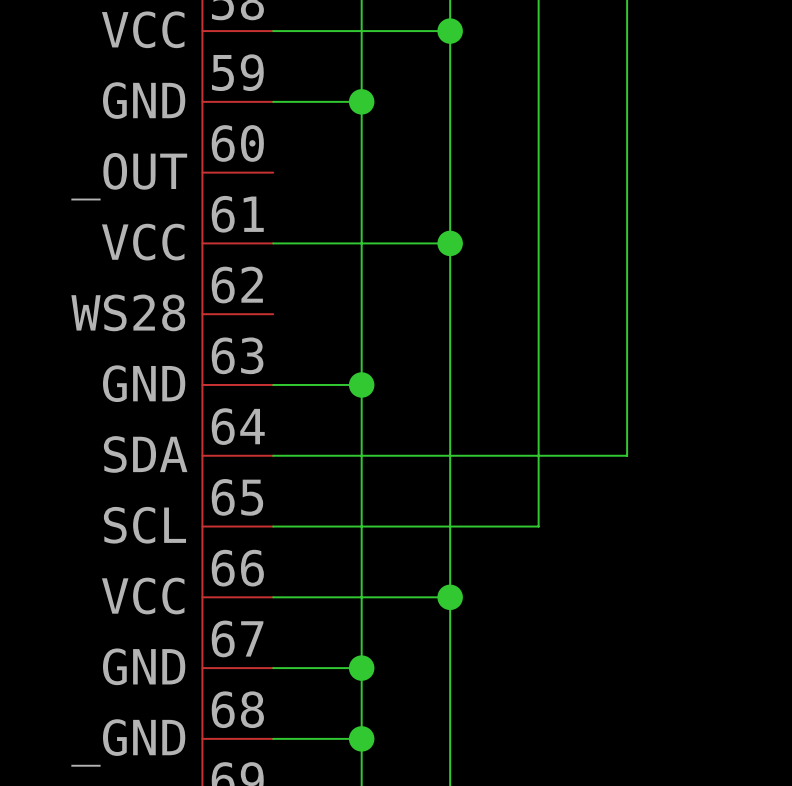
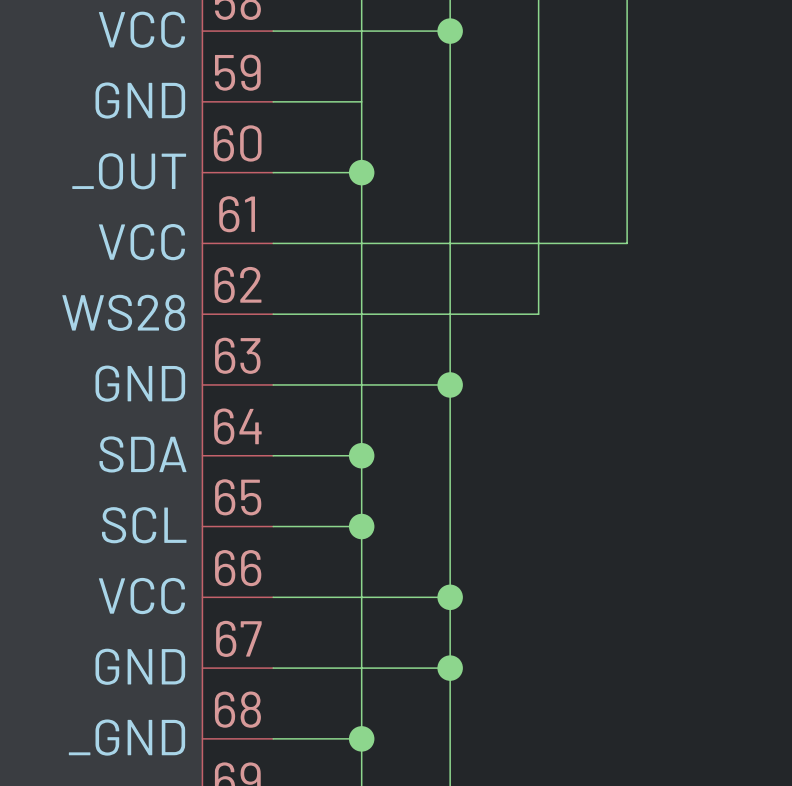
junction: (361, 101) -> none
wire: none -> (273, 172) (361, 172)
junction: none -> (361, 172)
junction: (450, 243) -> none
wire: (627, 243) (627, 455) (361, 455) -> (627, 243) (450, 243)
wire: (538, 314) (538, 526) (361, 526) -> (538, 314) (273, 314)
wire: none -> (361, 384) (450, 384)
junction: (361, 384) -> none
junction: none -> (450, 384)
junction: none -> (361, 455)
junction: none -> (361, 526)
wire: none -> (361, 668) (450, 668)
junction: (361, 668) -> none
junction: none -> (450, 668)

